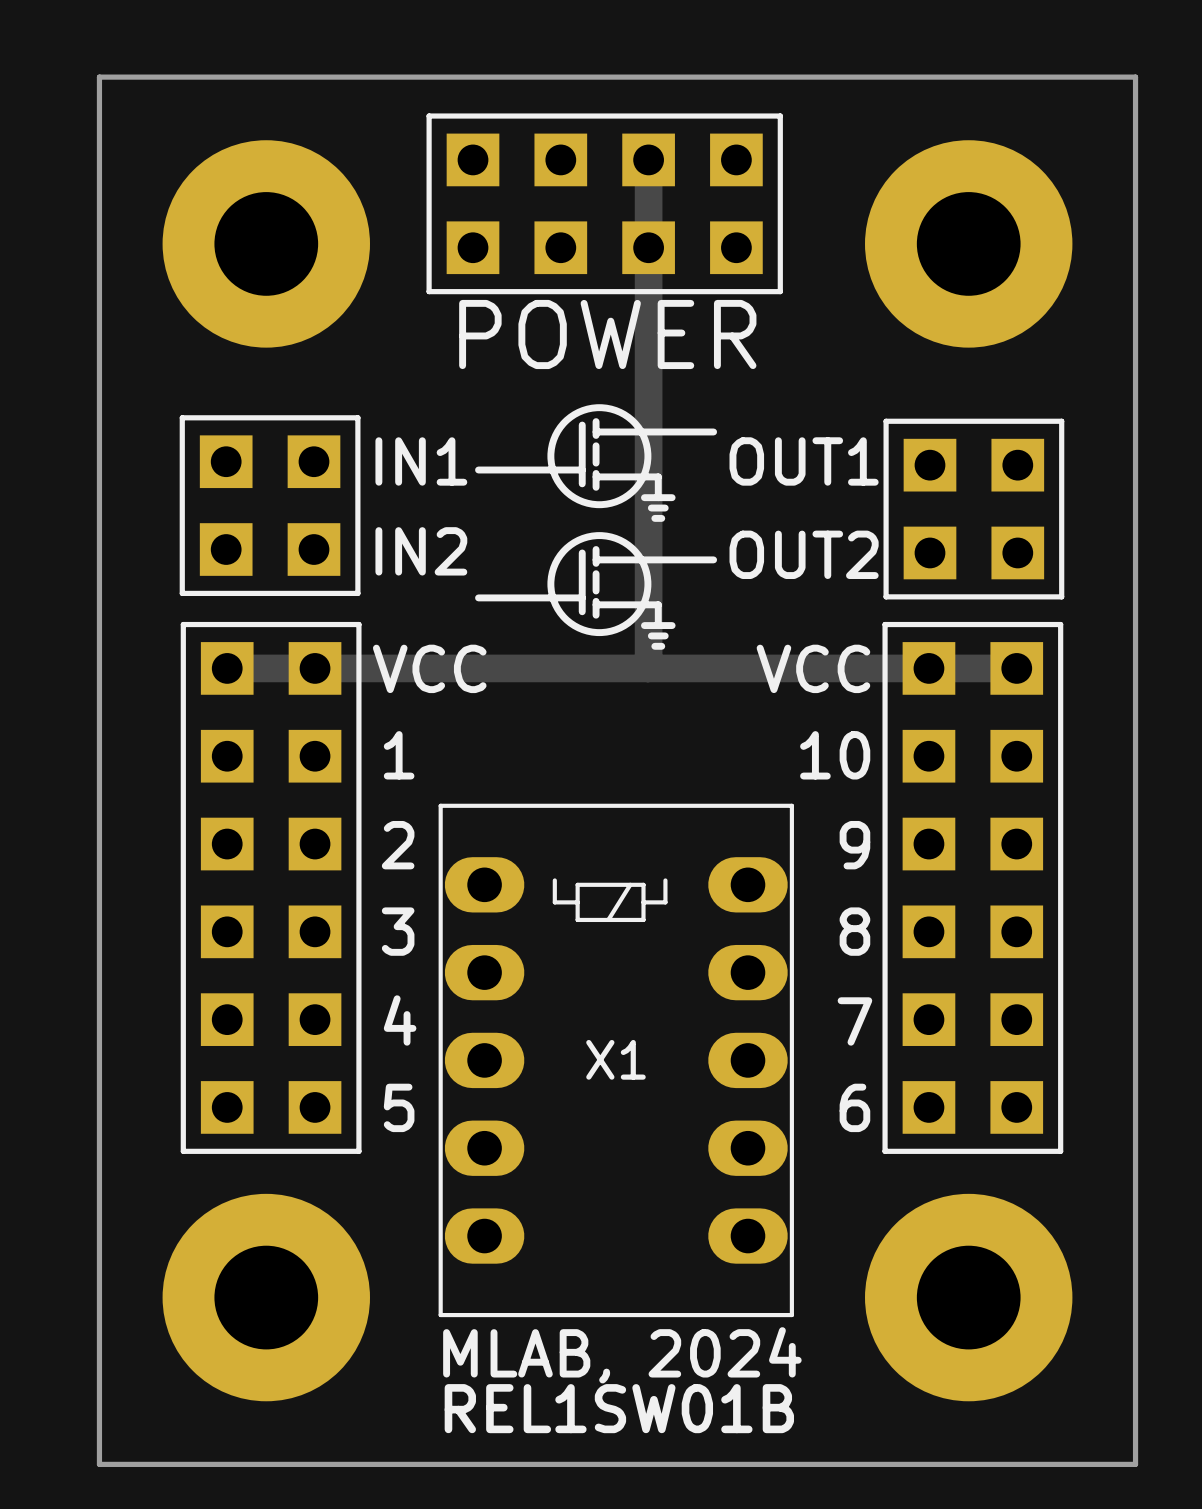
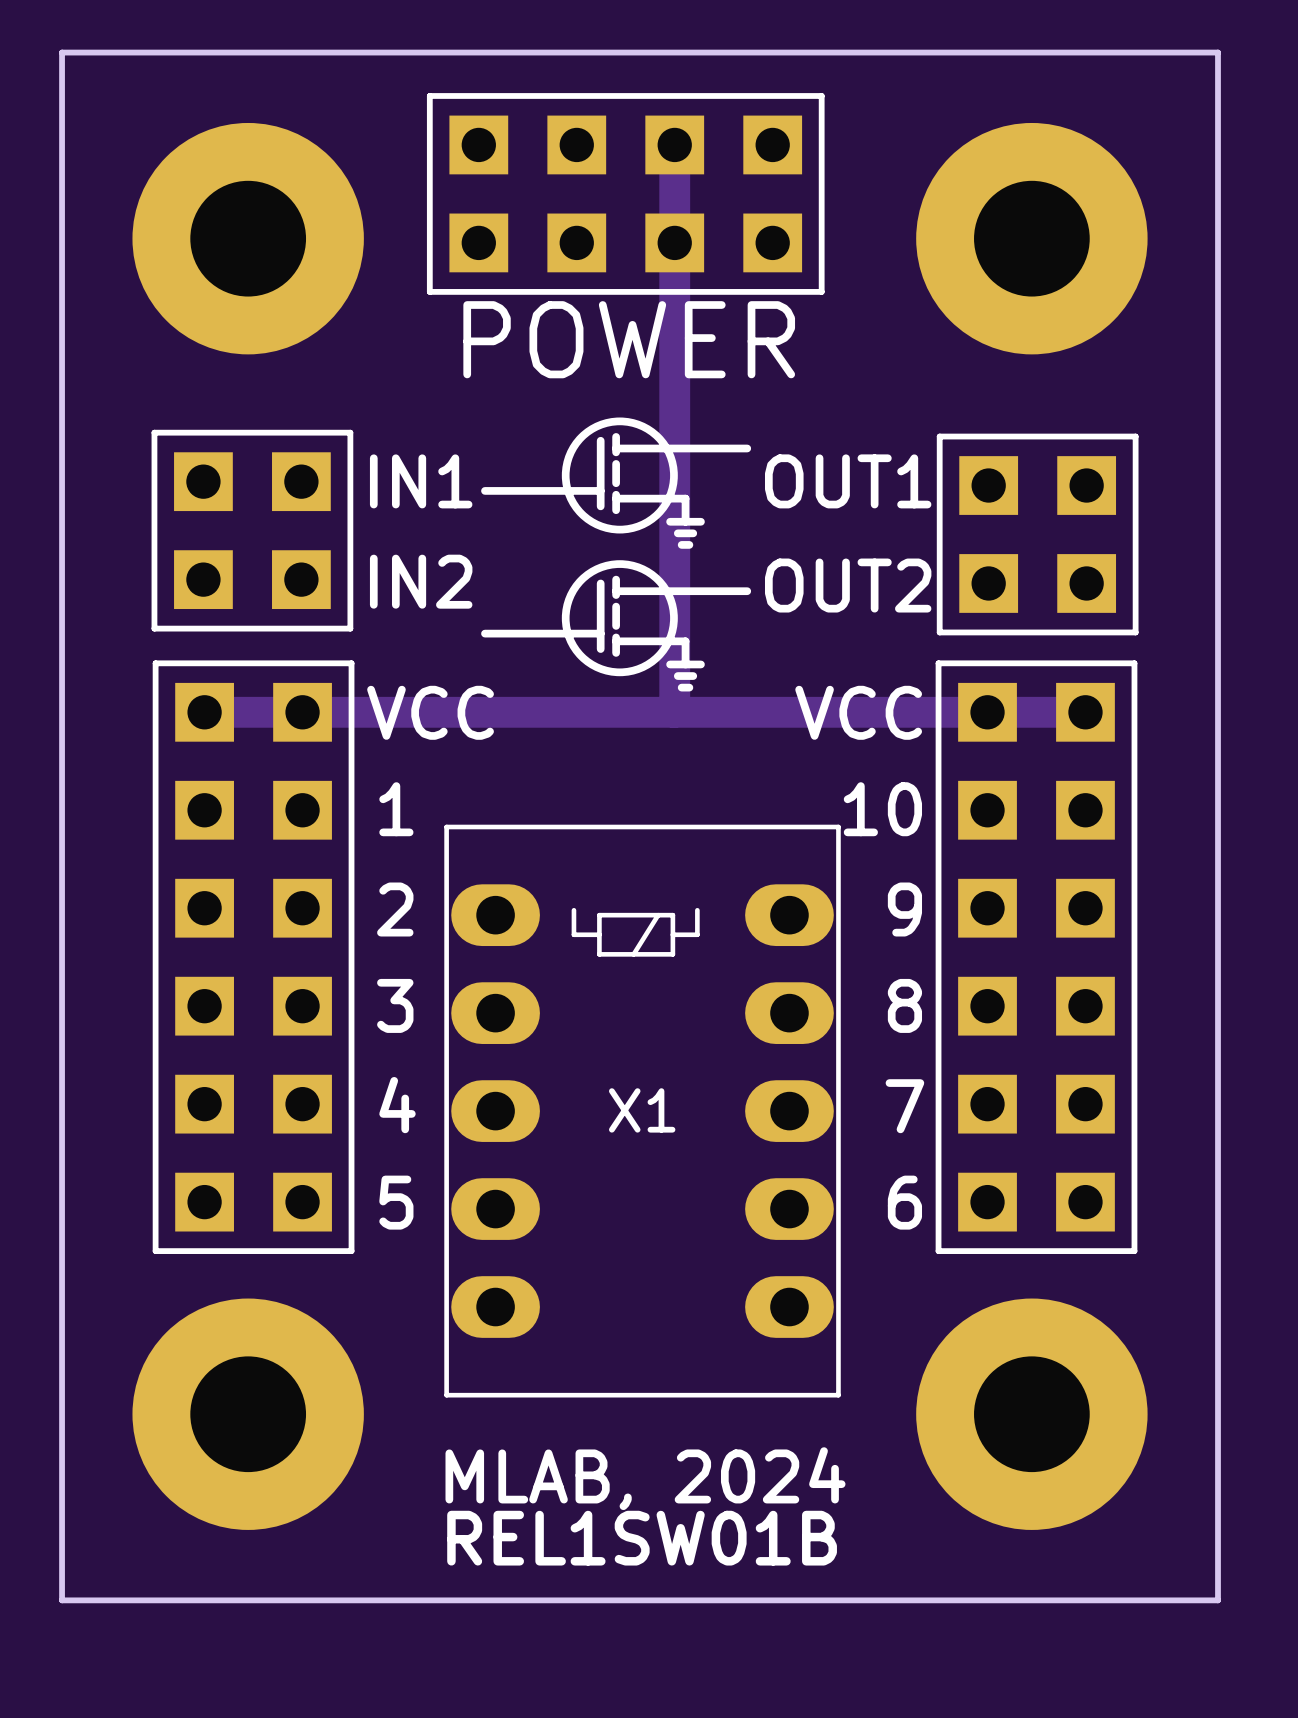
X1 position: (616, 1060) -> (642, 1111)

